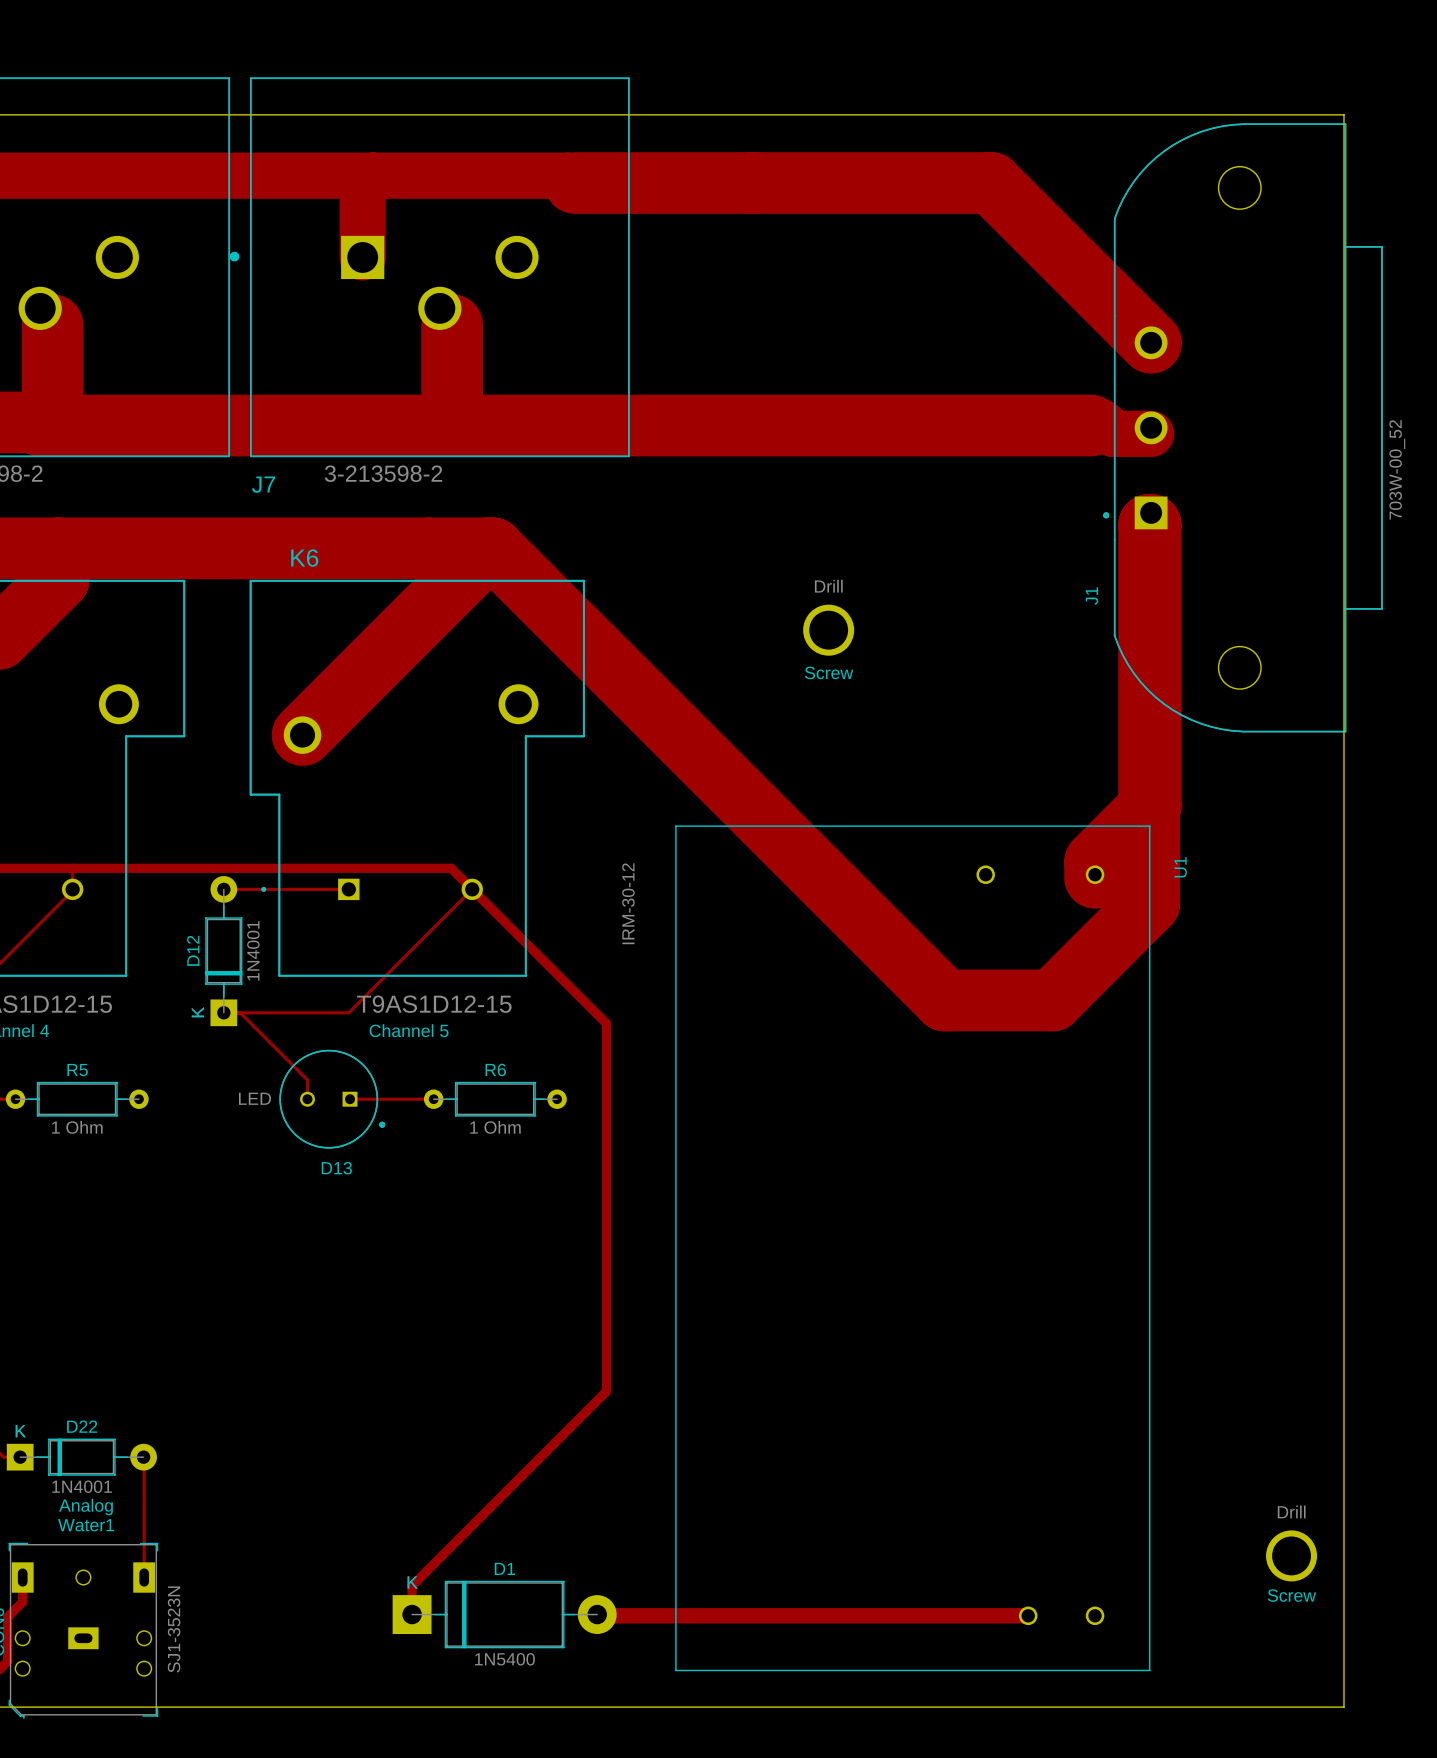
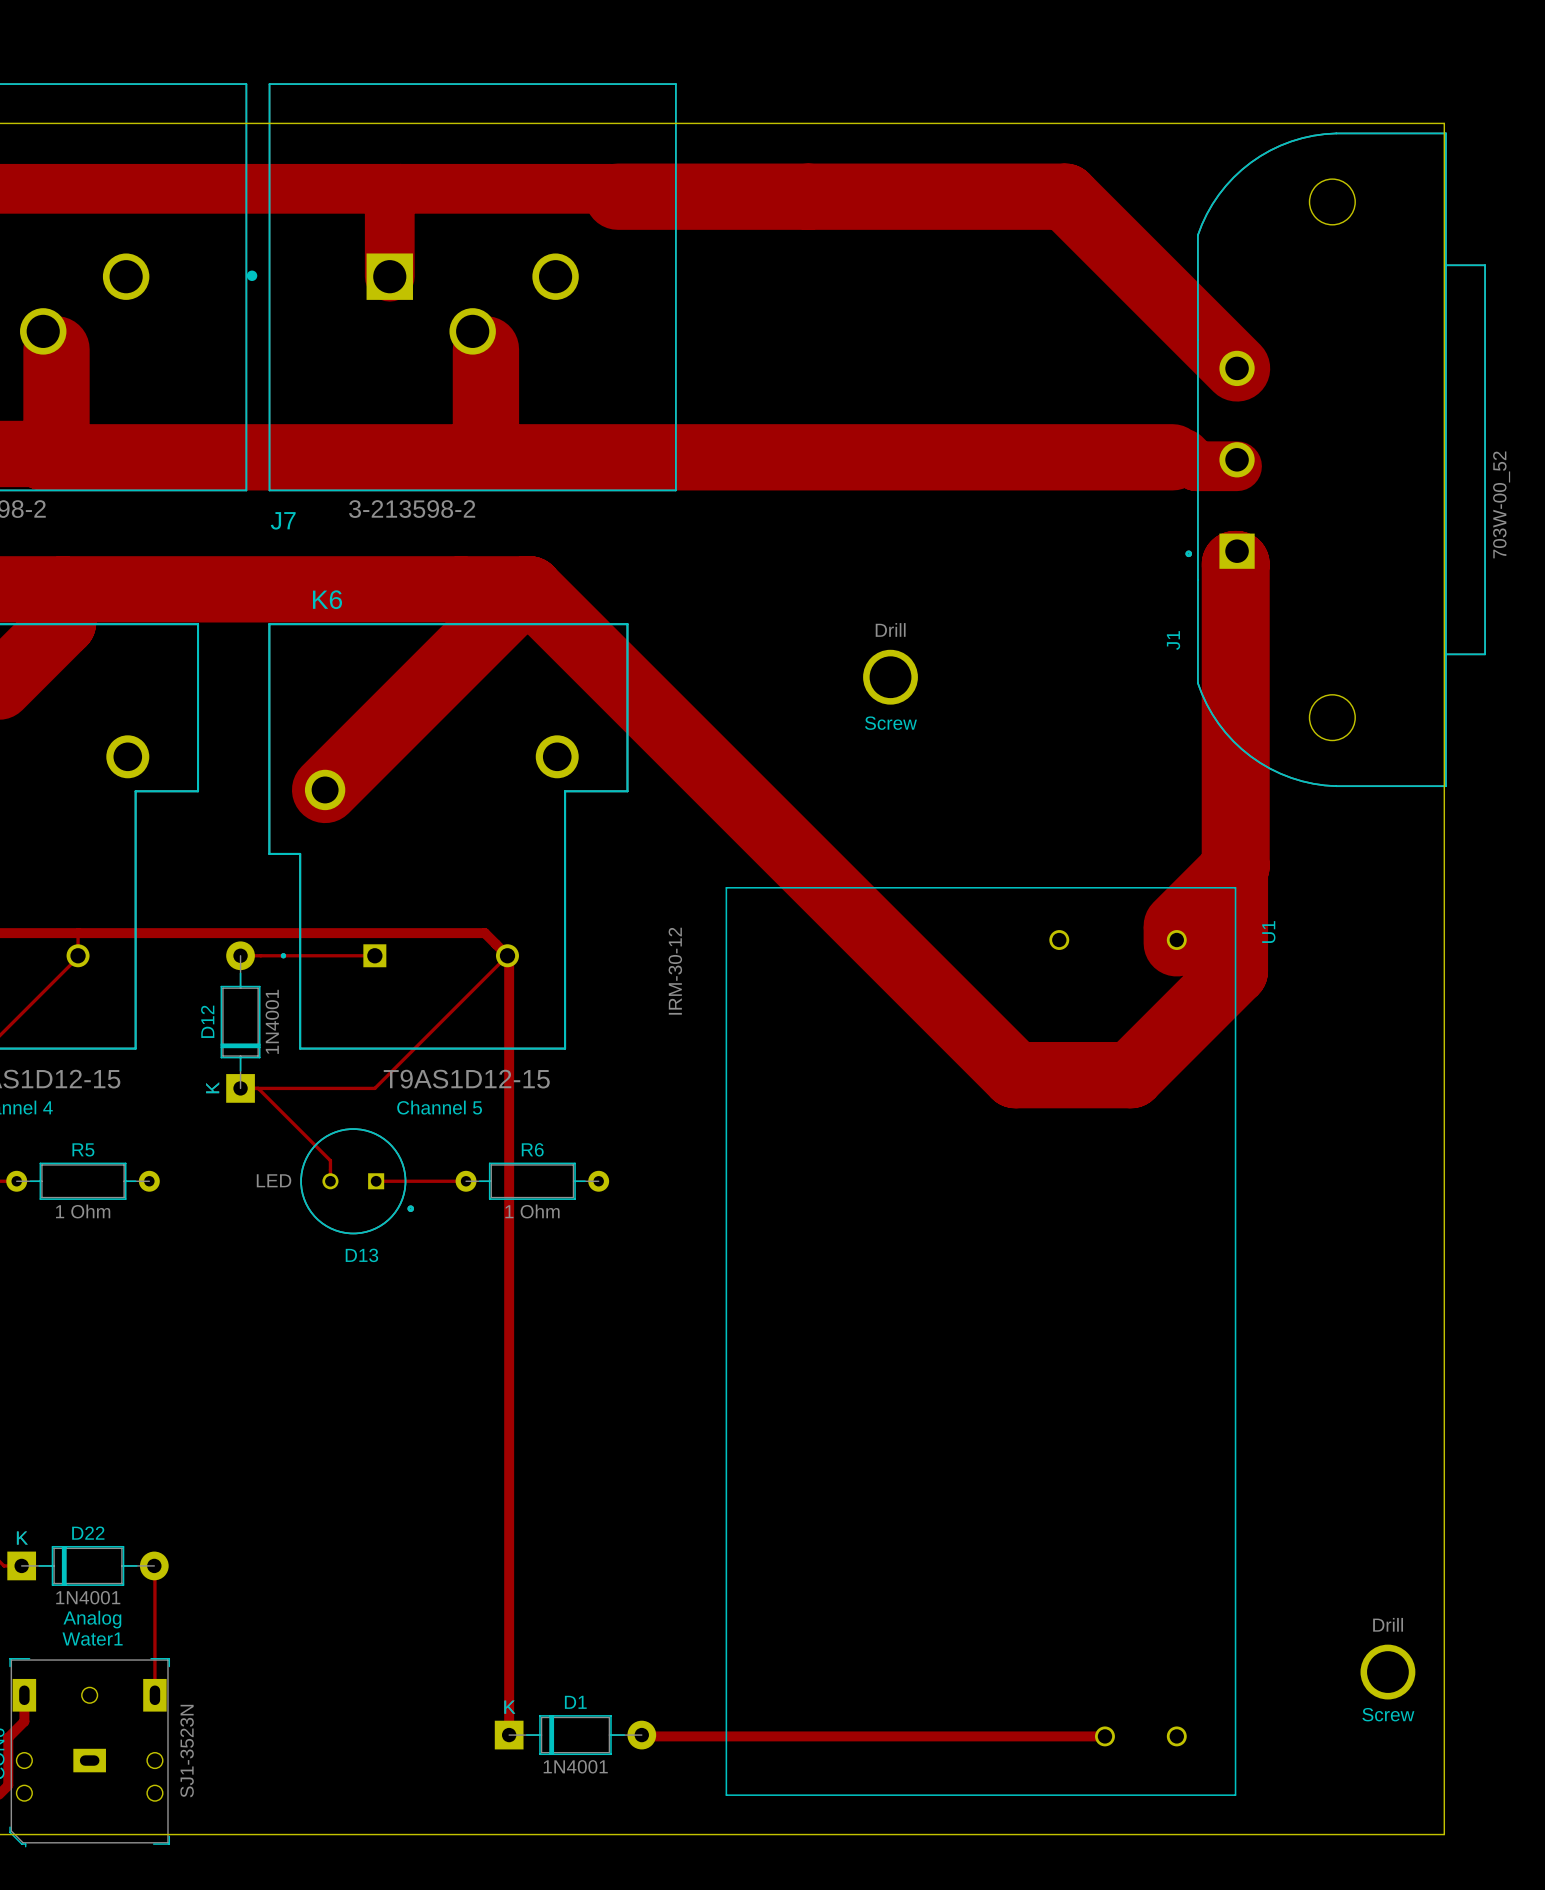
track: (473, 890) (606, 1023) (606, 1391) (412, 1585) (412, 1614) -> (509, 957) (509, 1735)
D1 footprint: [392, 1580, 617, 1649] -> [494, 1715, 657, 1756]
track width: thick (597, 1614) (1028, 1615) -> thin (641, 1735) (1104, 1736)
D1 value: 1N5400 (504, 1659) -> 1N4001 (575, 1766)

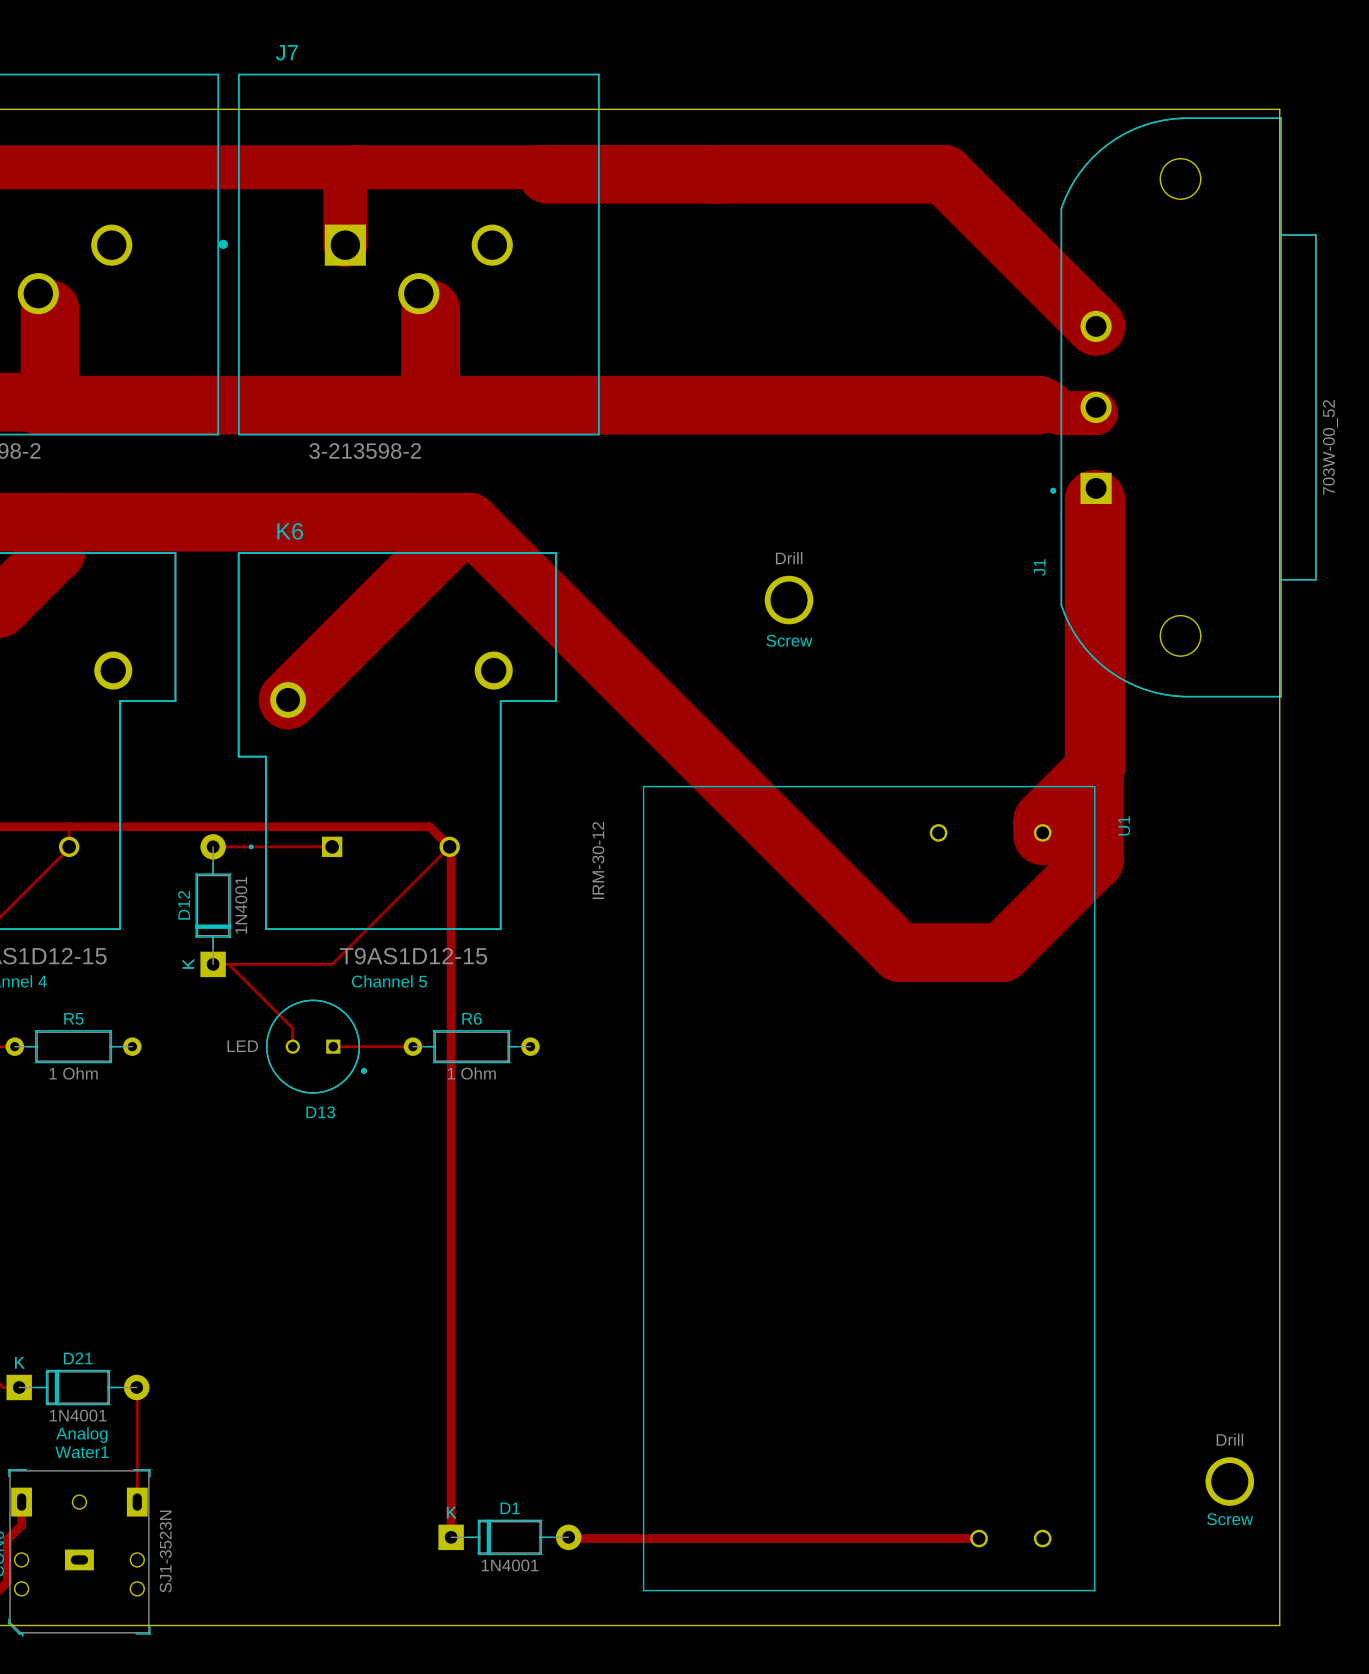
J7 name position: J7 (283, 520) -> J7 (286, 52)
D22 name: D22 (88, 1533) -> D21 (78, 1358)

